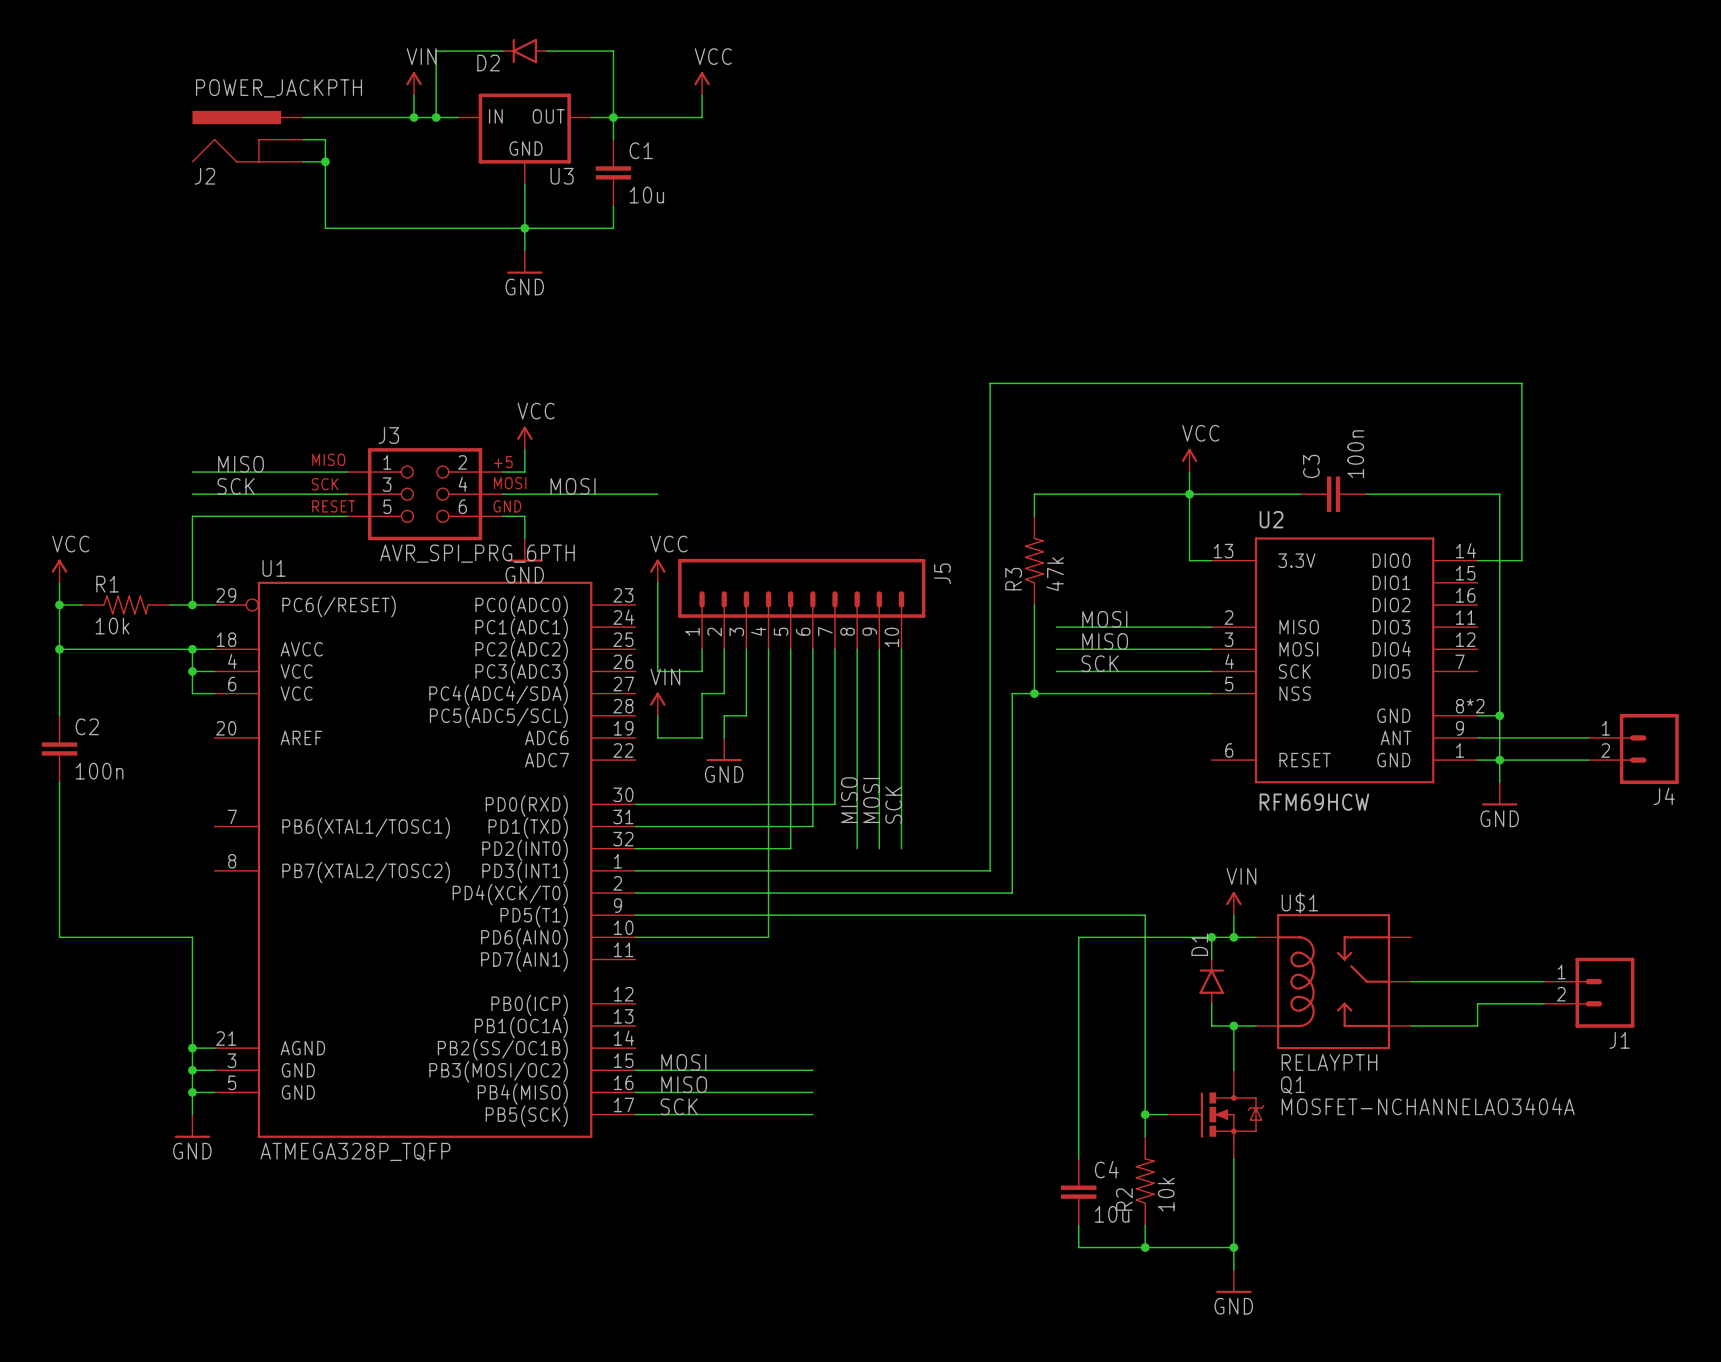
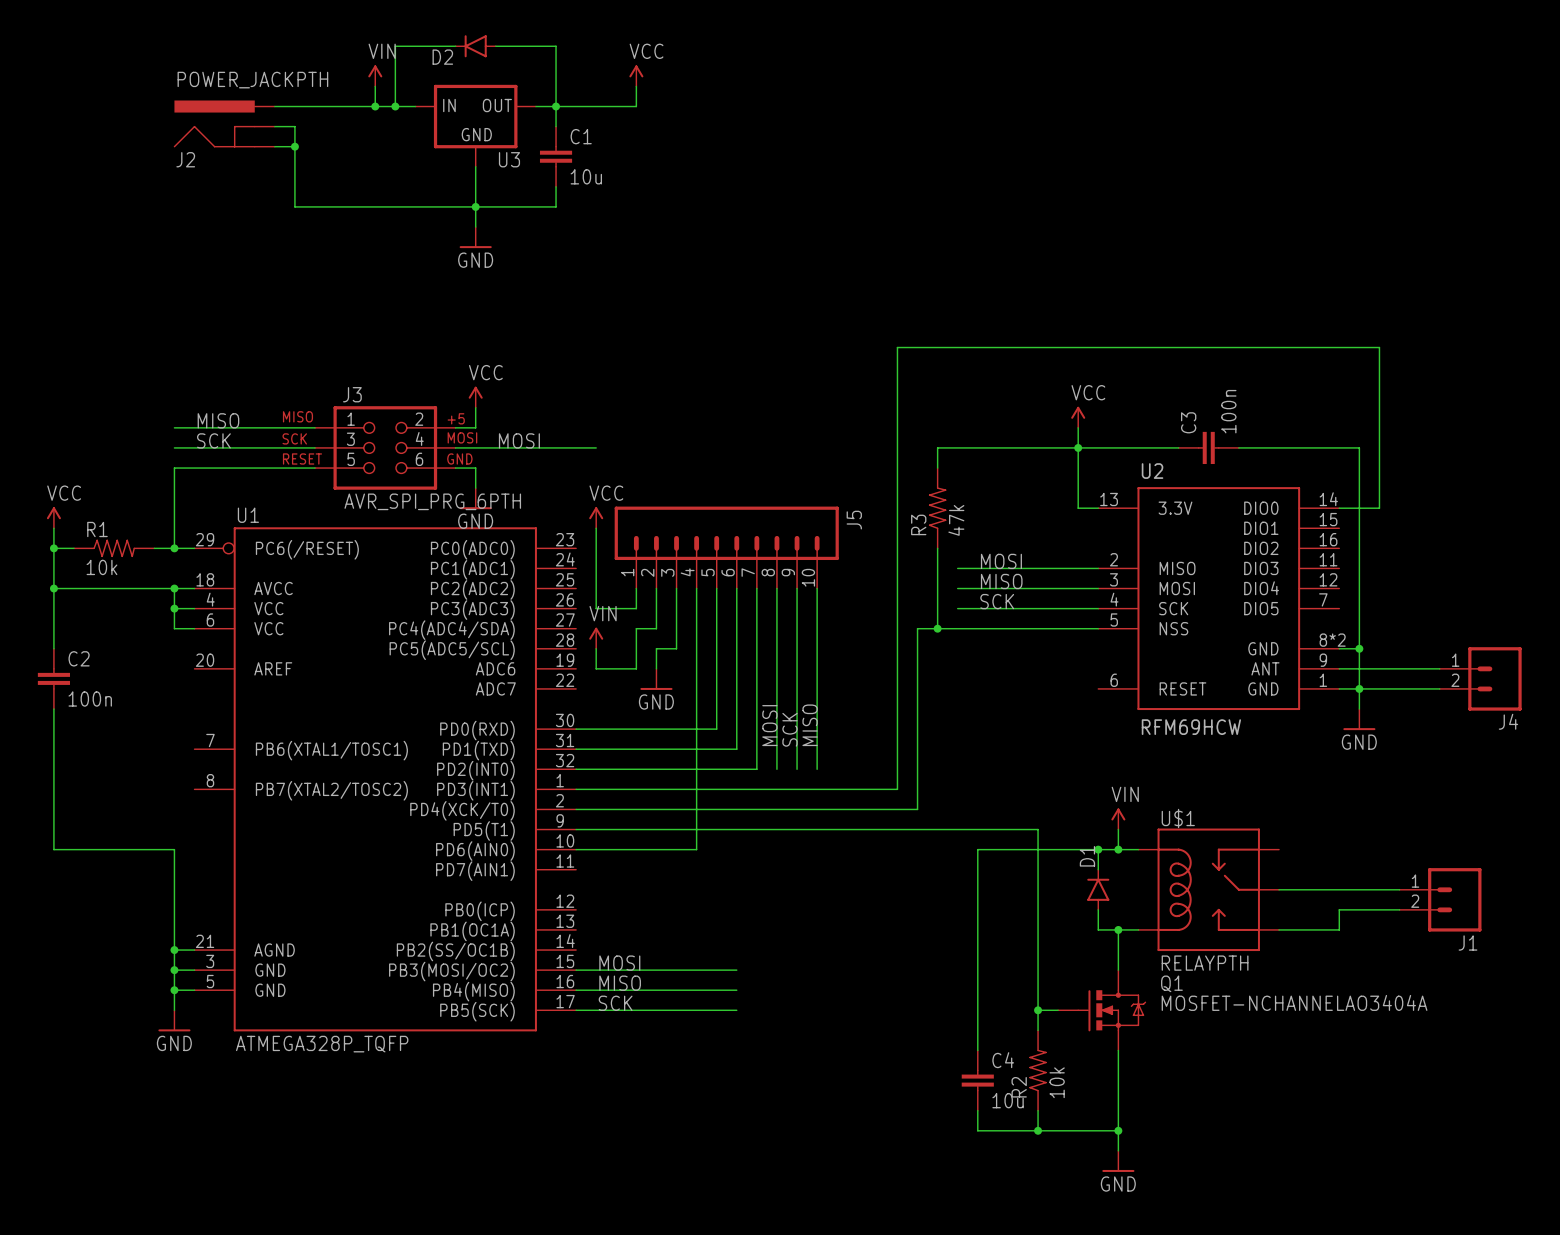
label: MISO (849, 800) -> MOSI (769, 725)
label: MOSI (871, 800) -> SCK (790, 729)
wire: (835, 804) (790, 804) (790, 848) -> (756, 729) (756, 769) (716, 769)
label: SCK (893, 805) -> MISO (810, 725)

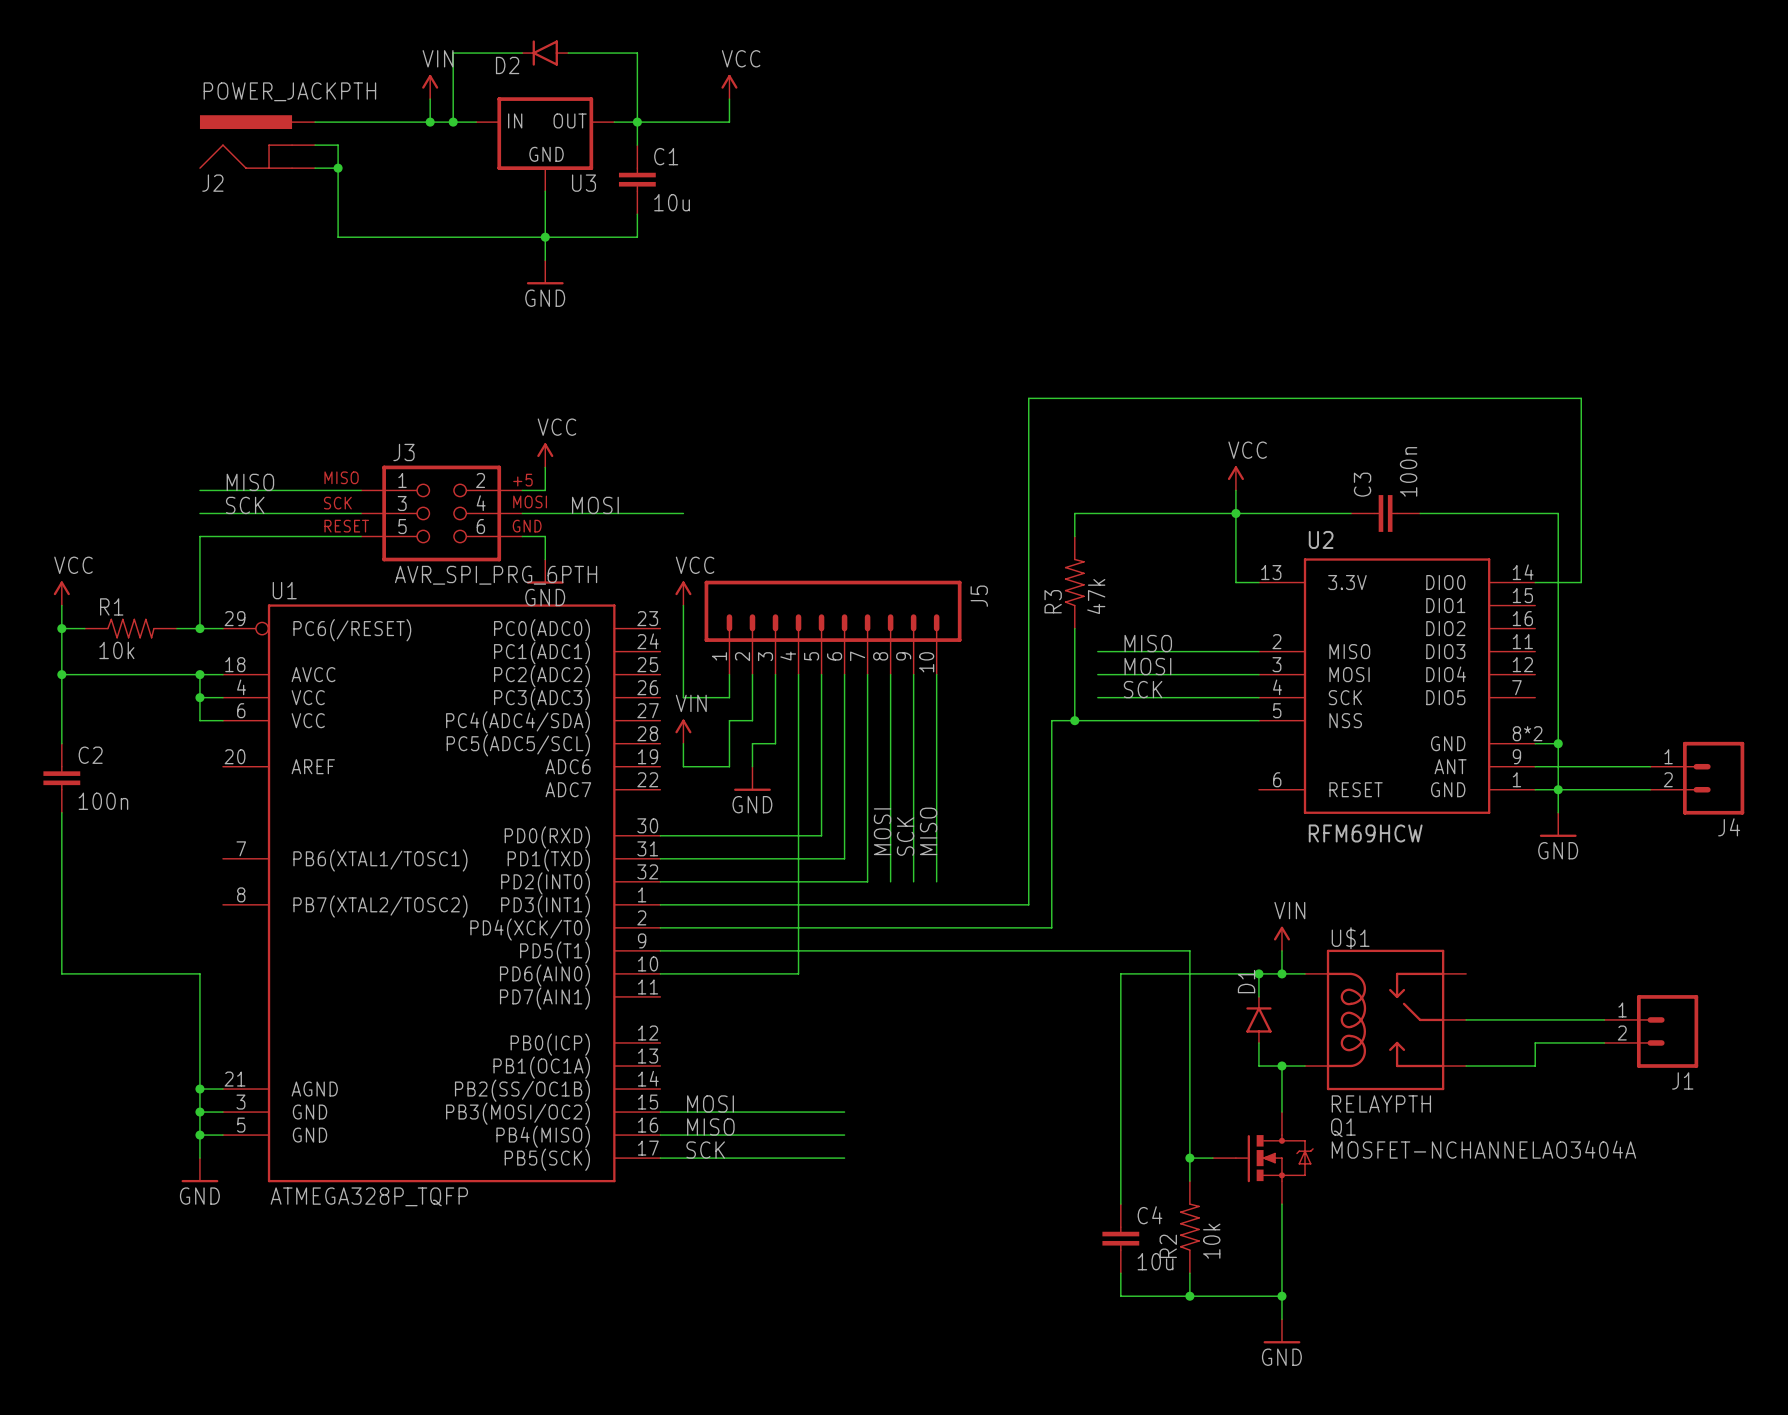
label: MOSI (1001, 561) -> MISO (1148, 643)
label: MISO (1001, 581) -> MOSI (1147, 666)

